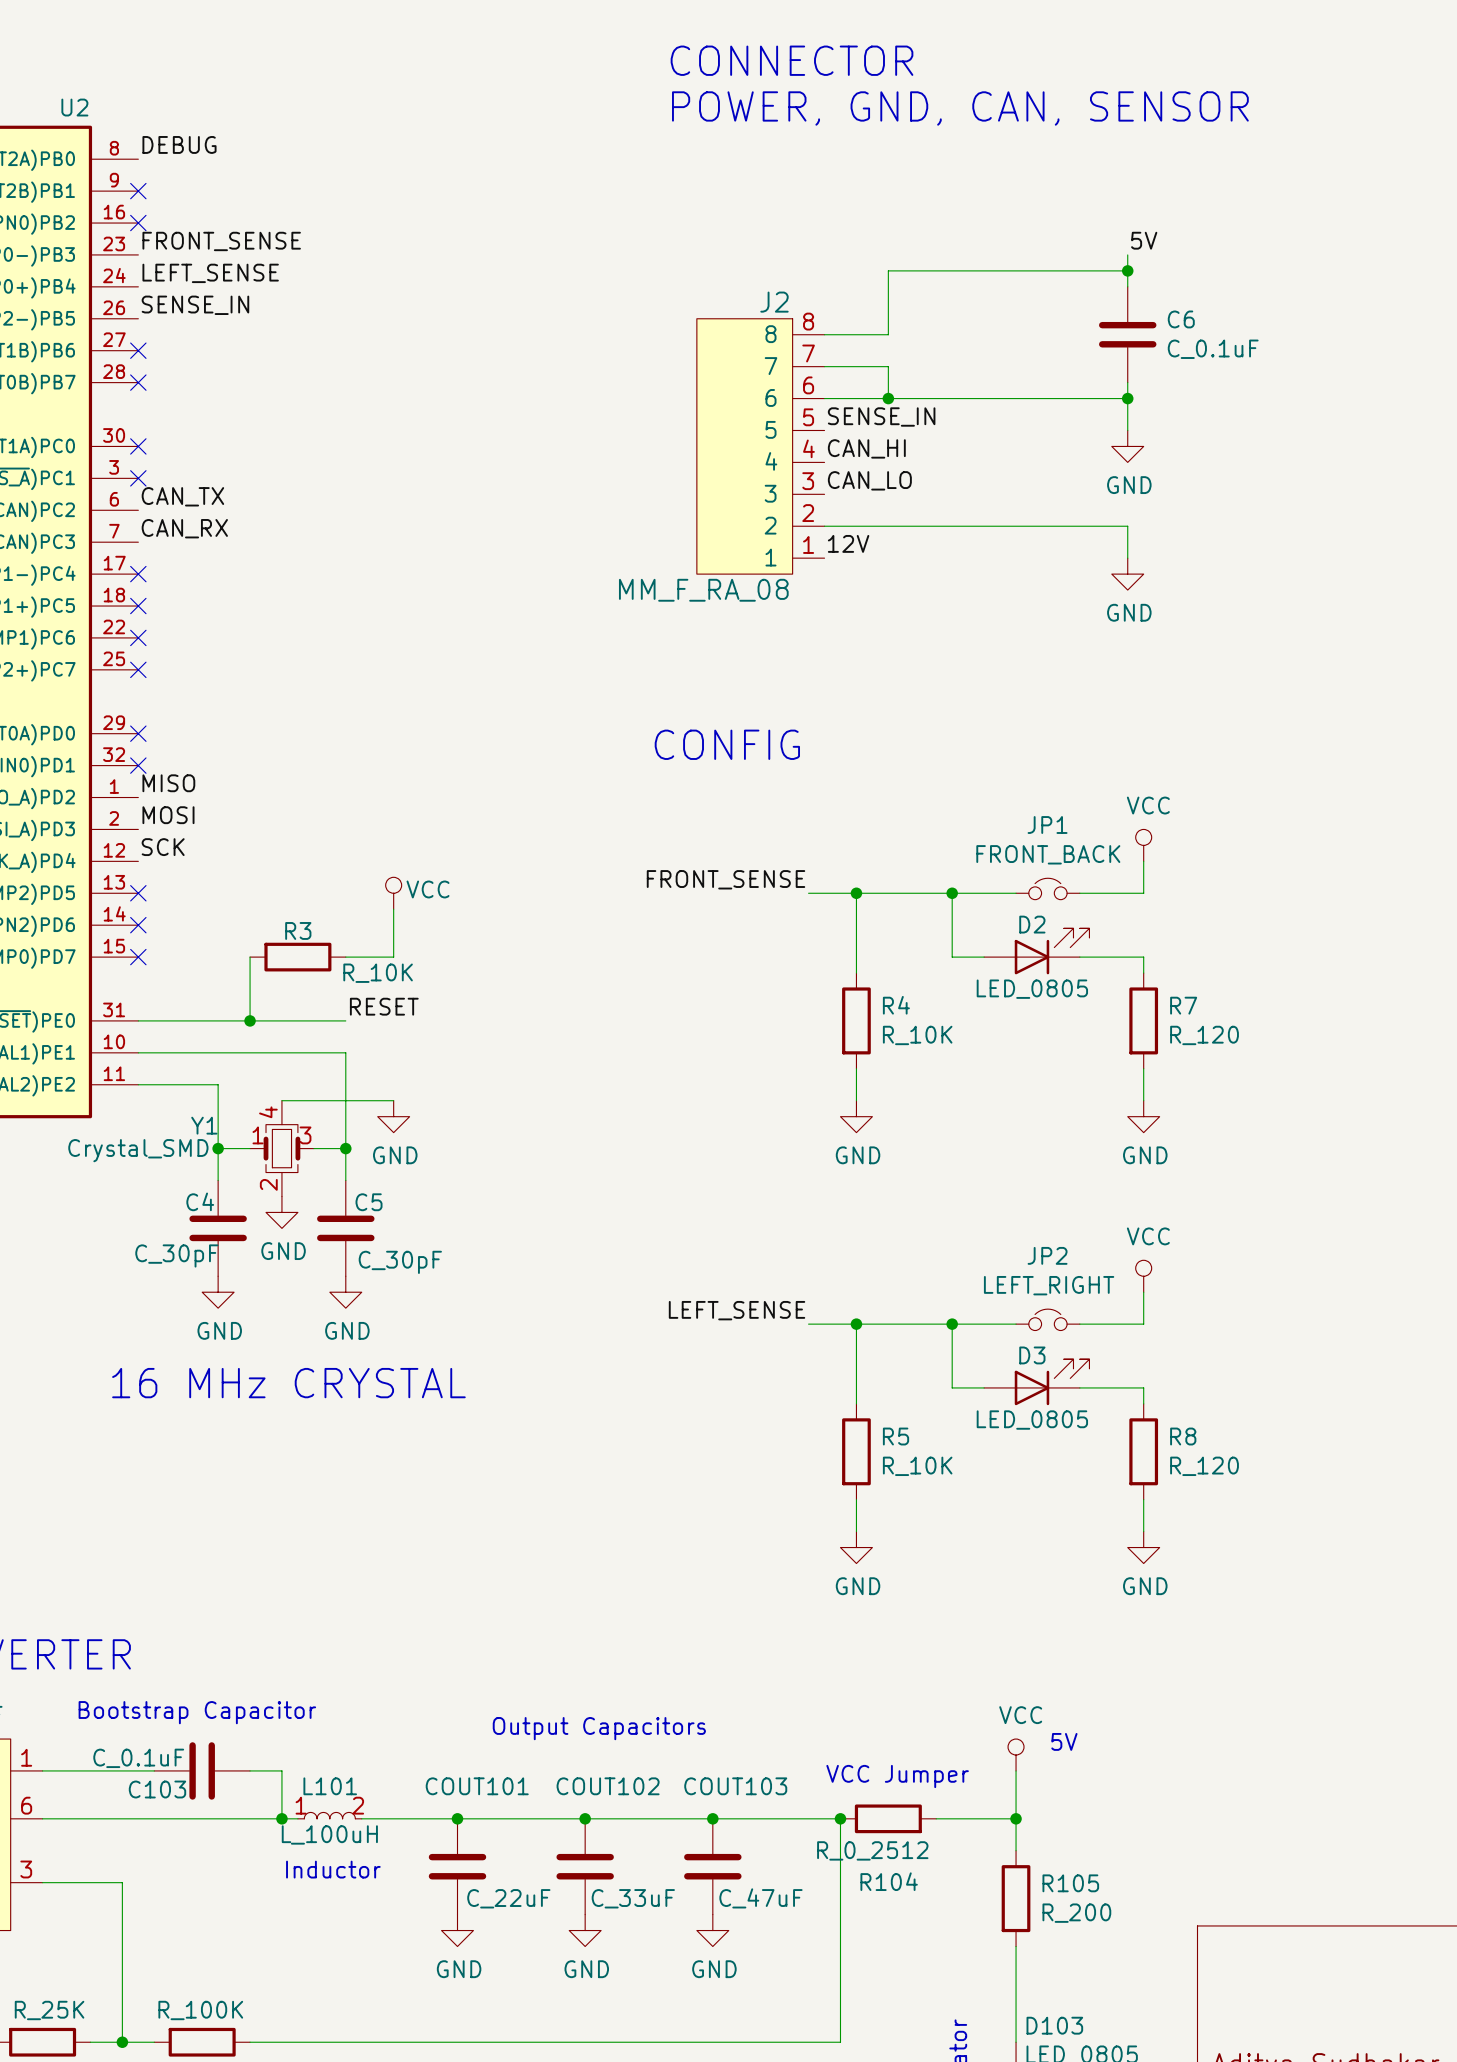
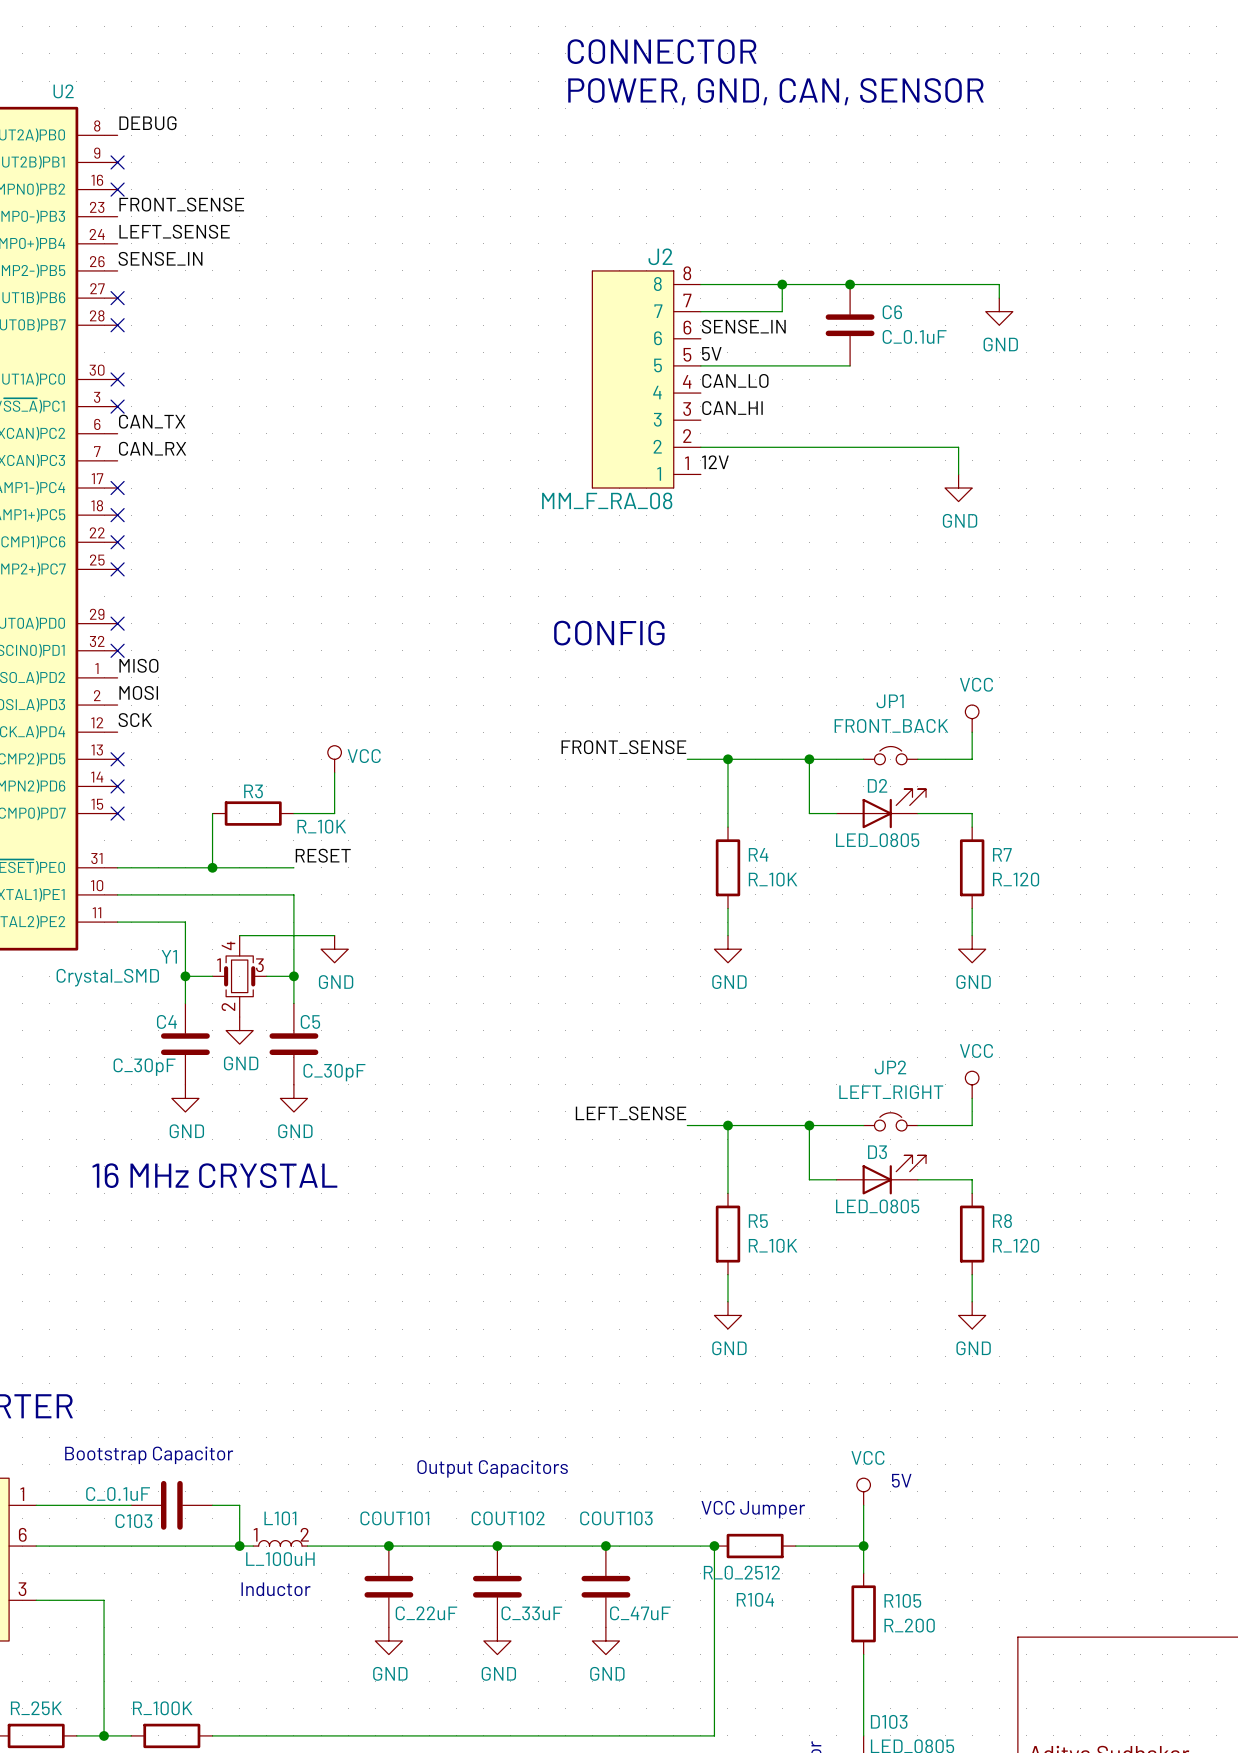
label: 5V (1144, 240) -> none
wire: (1127, 254) (1127, 286) -> none
wire: (1127, 270) (888, 270) (888, 334) -> (999, 298) (999, 284) (755, 284)
junction: (1127, 270) -> none
junction: none -> (782, 284)
junction: none -> (850, 284)
C6 position: (1127, 334) -> (850, 325)
wire: (888, 366) (888, 398) -> (755, 311) (782, 311) (782, 284)
wire: (1127, 382) (1127, 430) -> none
label: none -> SENSE_IN (743, 326)
wire: (824, 398) (1127, 398) -> none
junction: (888, 398) -> none
junction: (1127, 398) -> none
label: SENSE_IN (881, 417) -> 5V (711, 353)
wire: none -> (700, 365) (850, 365)
power symbol position: GND (1127, 446) -> GND (999, 311)
label: CAN_HI (866, 448) -> CAN_LO (735, 380)
label: CAN_LO (869, 480) -> CAN_HI (732, 408)

